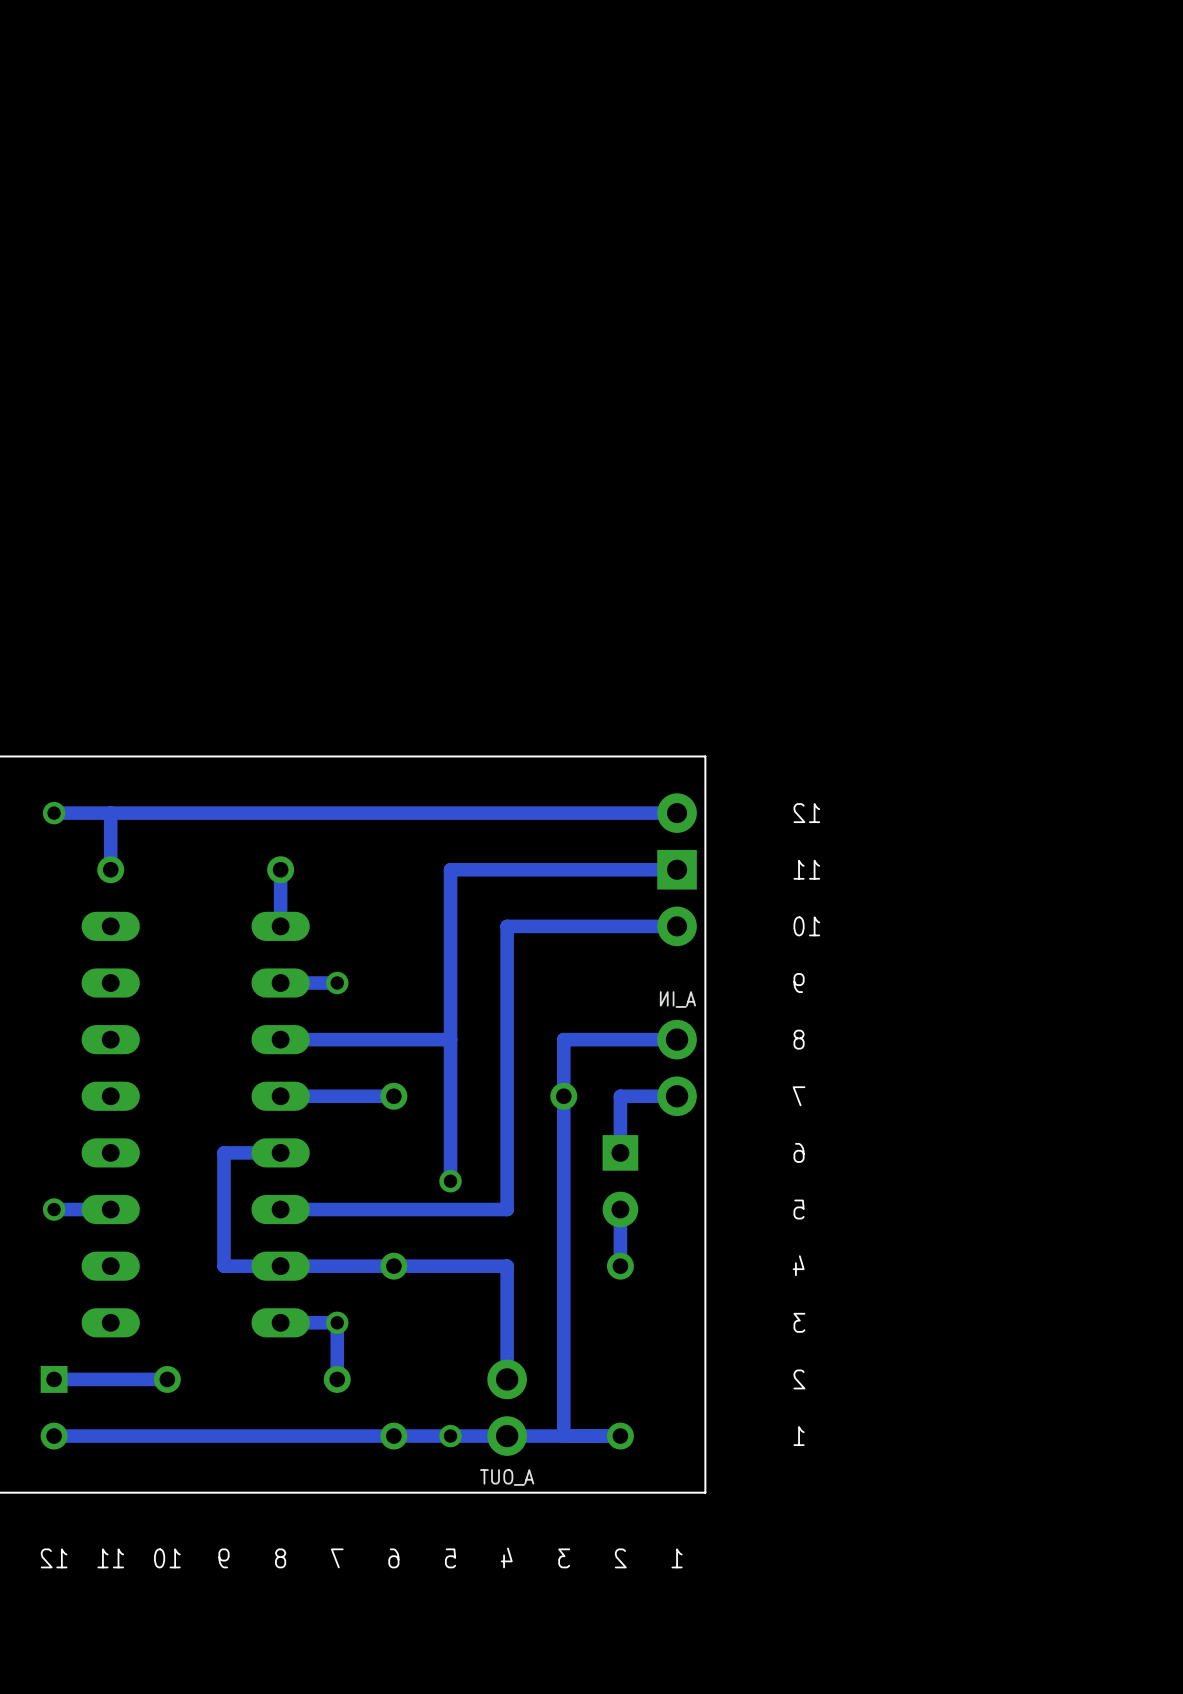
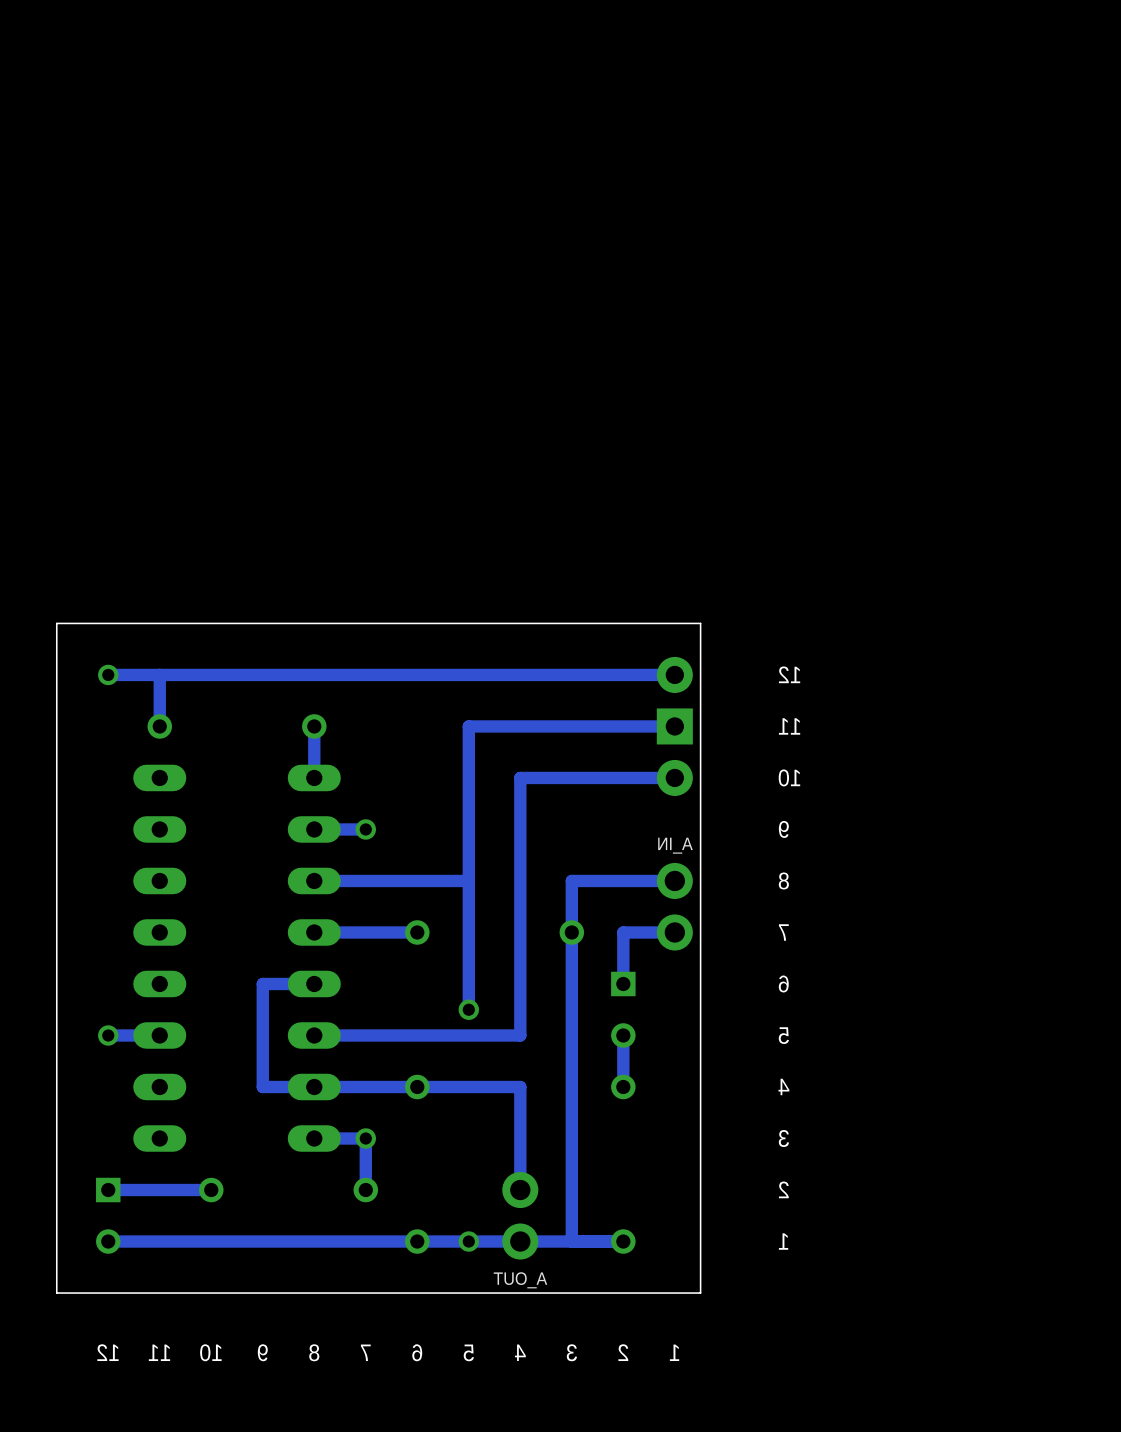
part footprint: [602, 1135, 639, 1228] -> [611, 971, 636, 1048]

